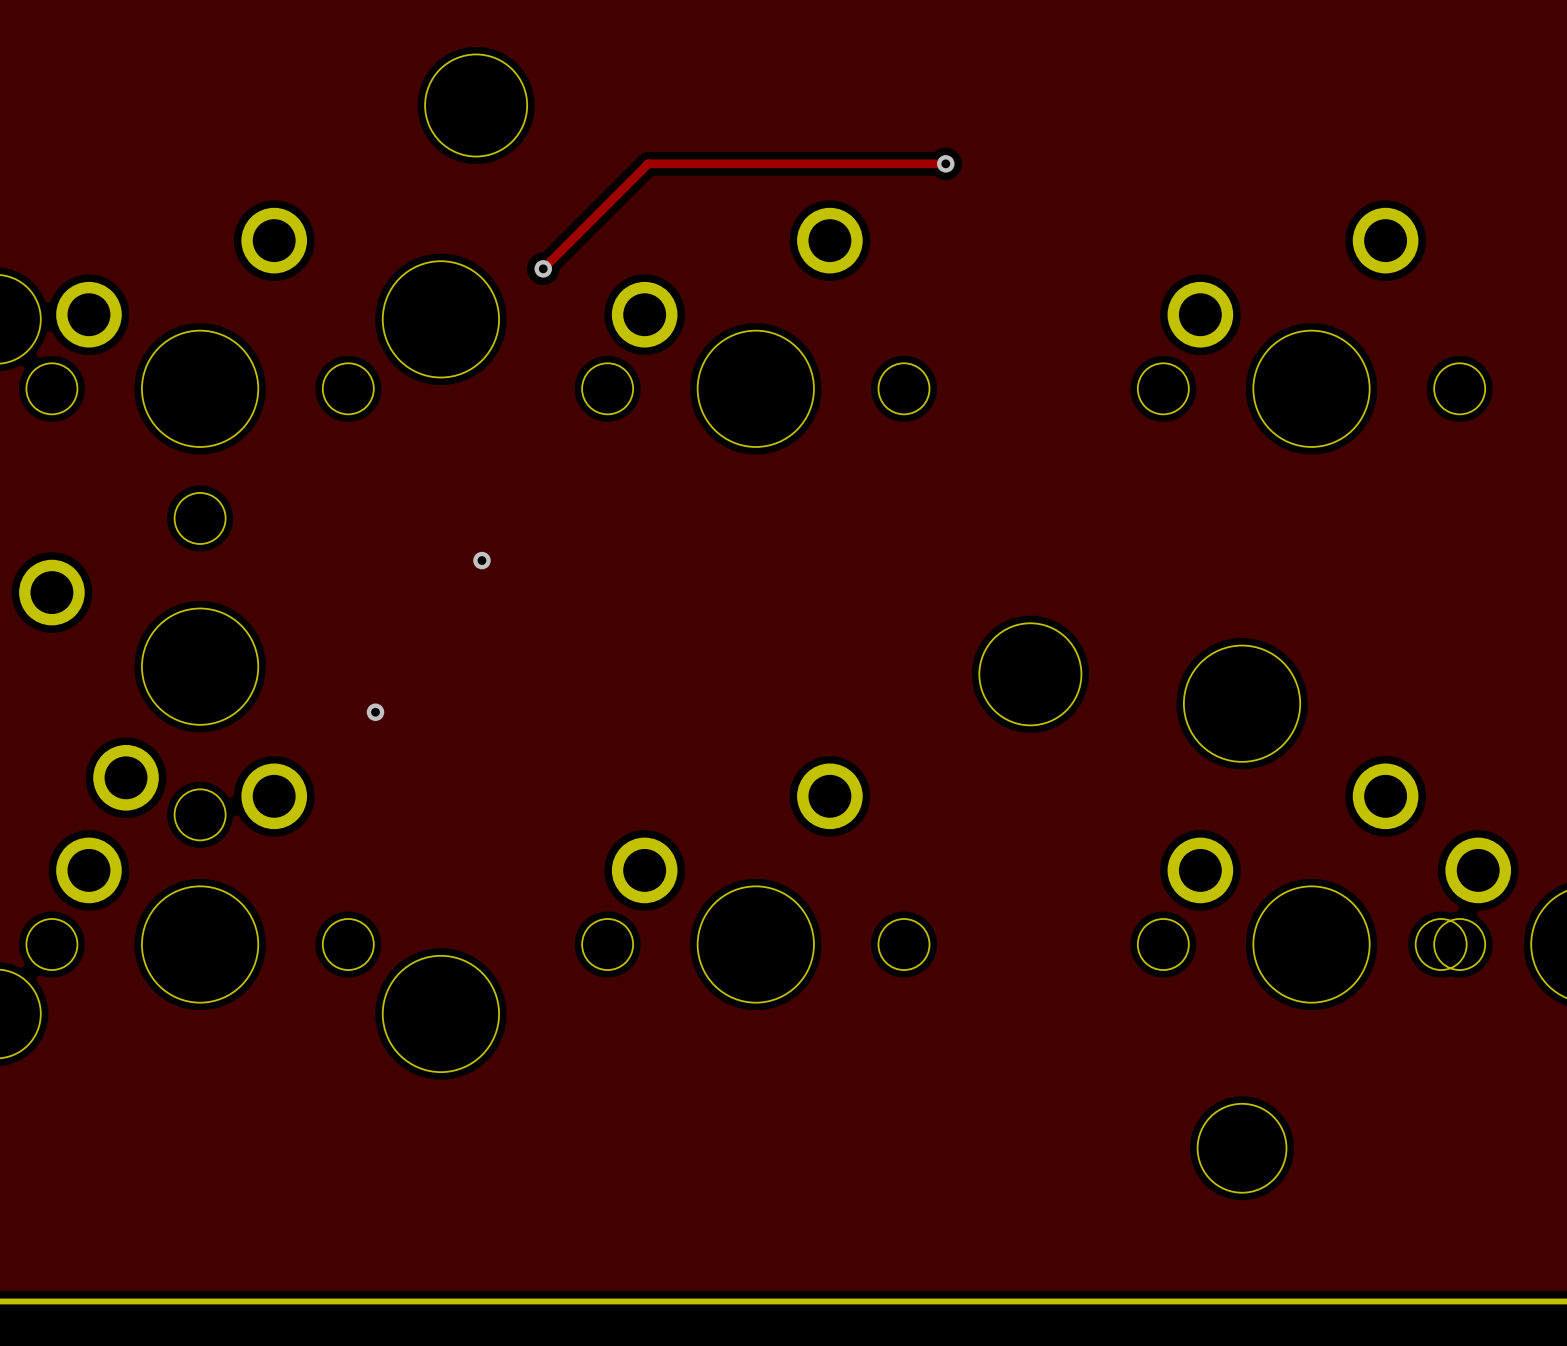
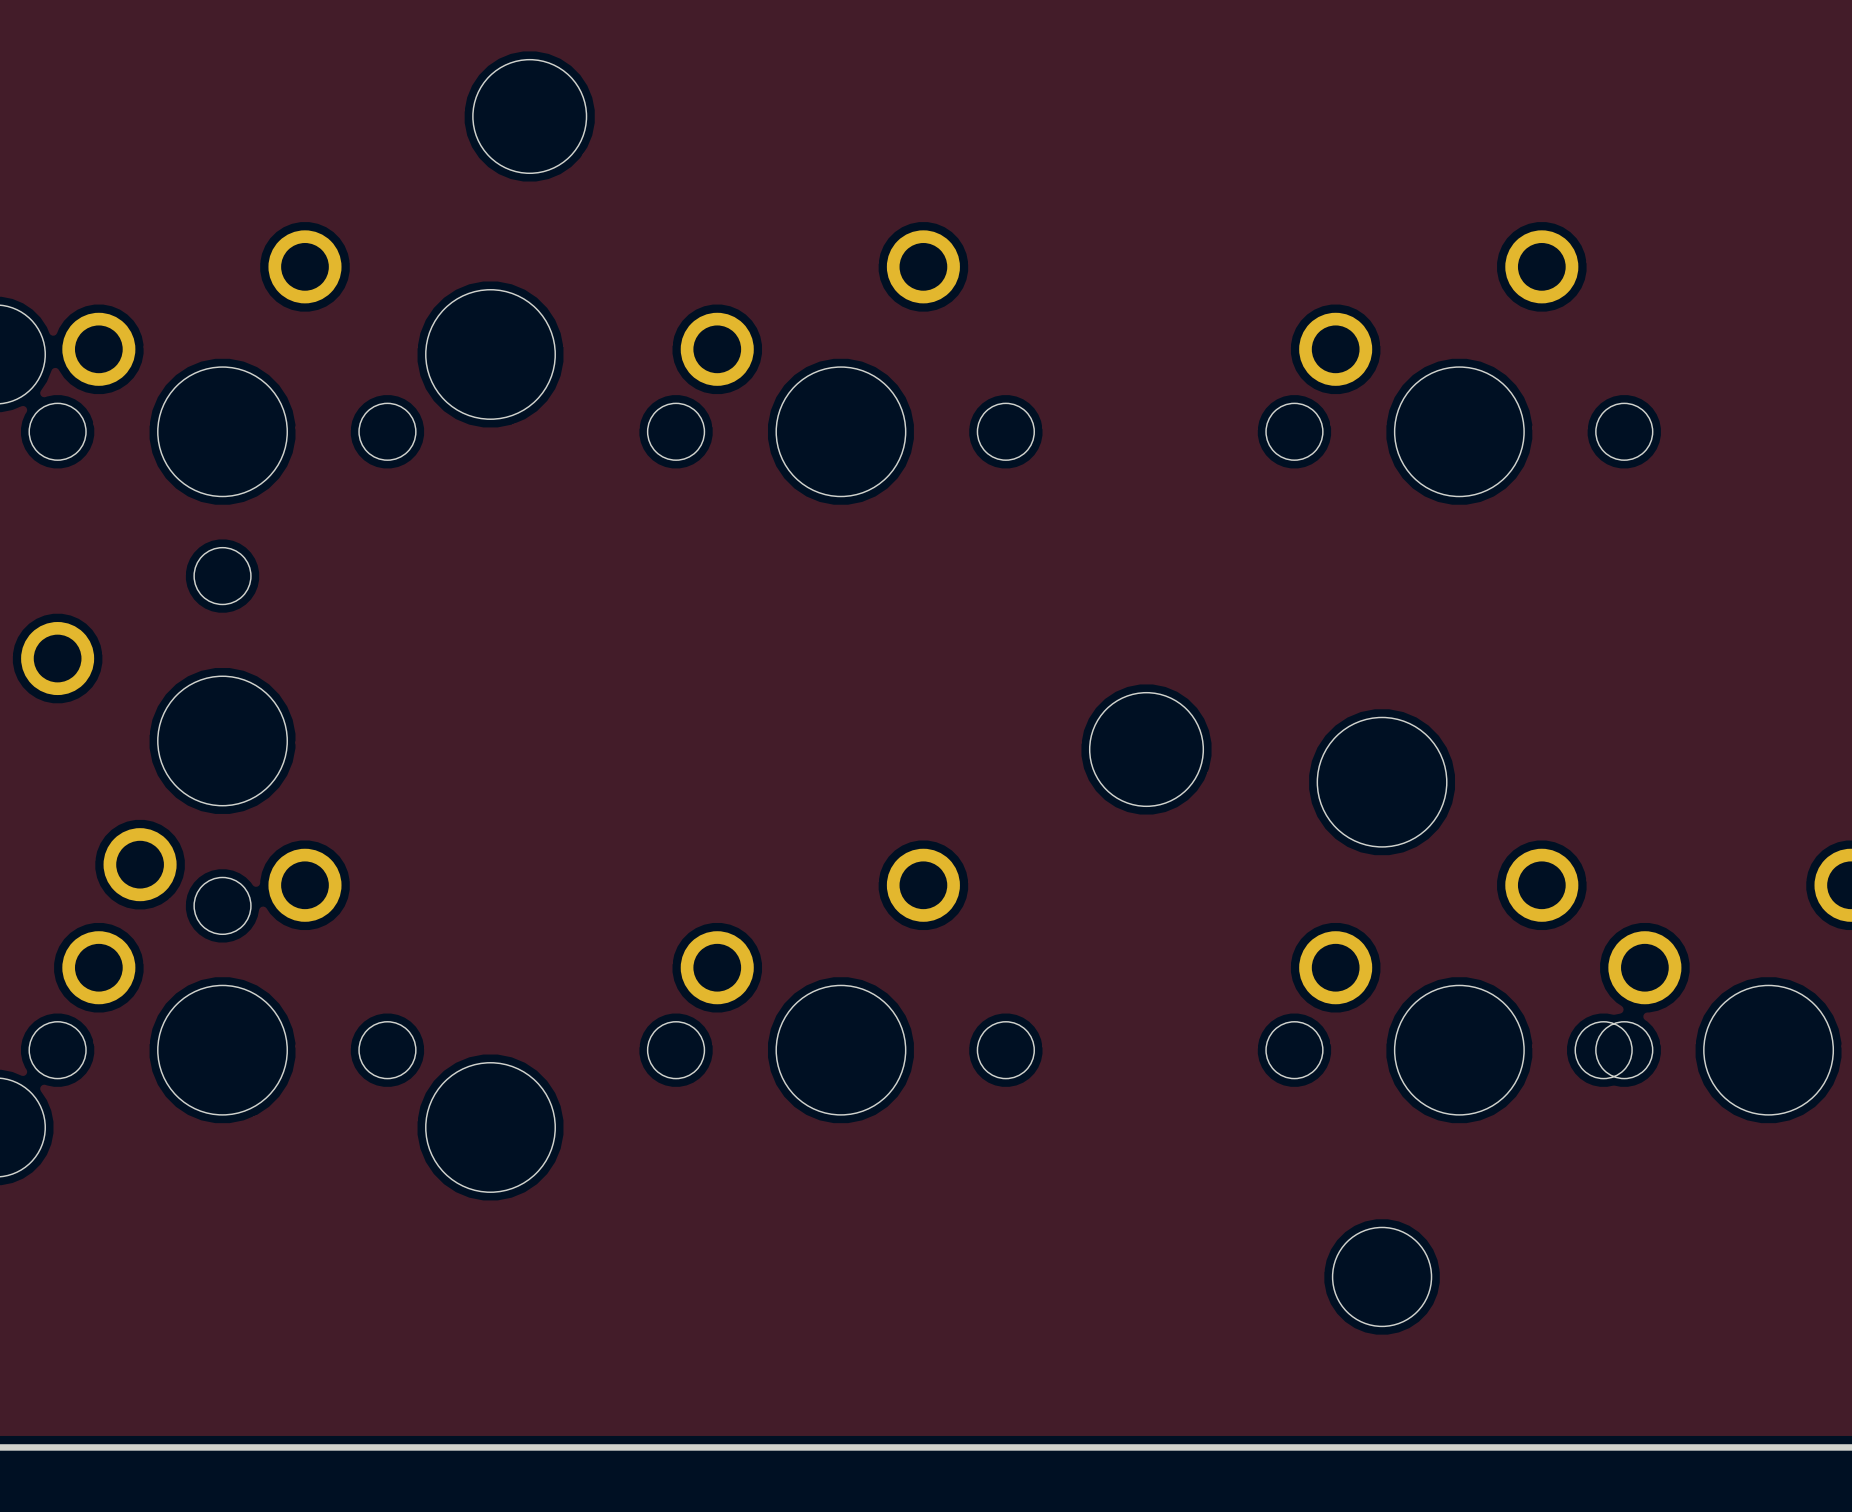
track: (945, 163) (648, 163) (543, 268) -> none
via: (945, 163) -> none
via: (543, 268) -> none
via: (481, 560) -> none
via: (375, 712) -> none

